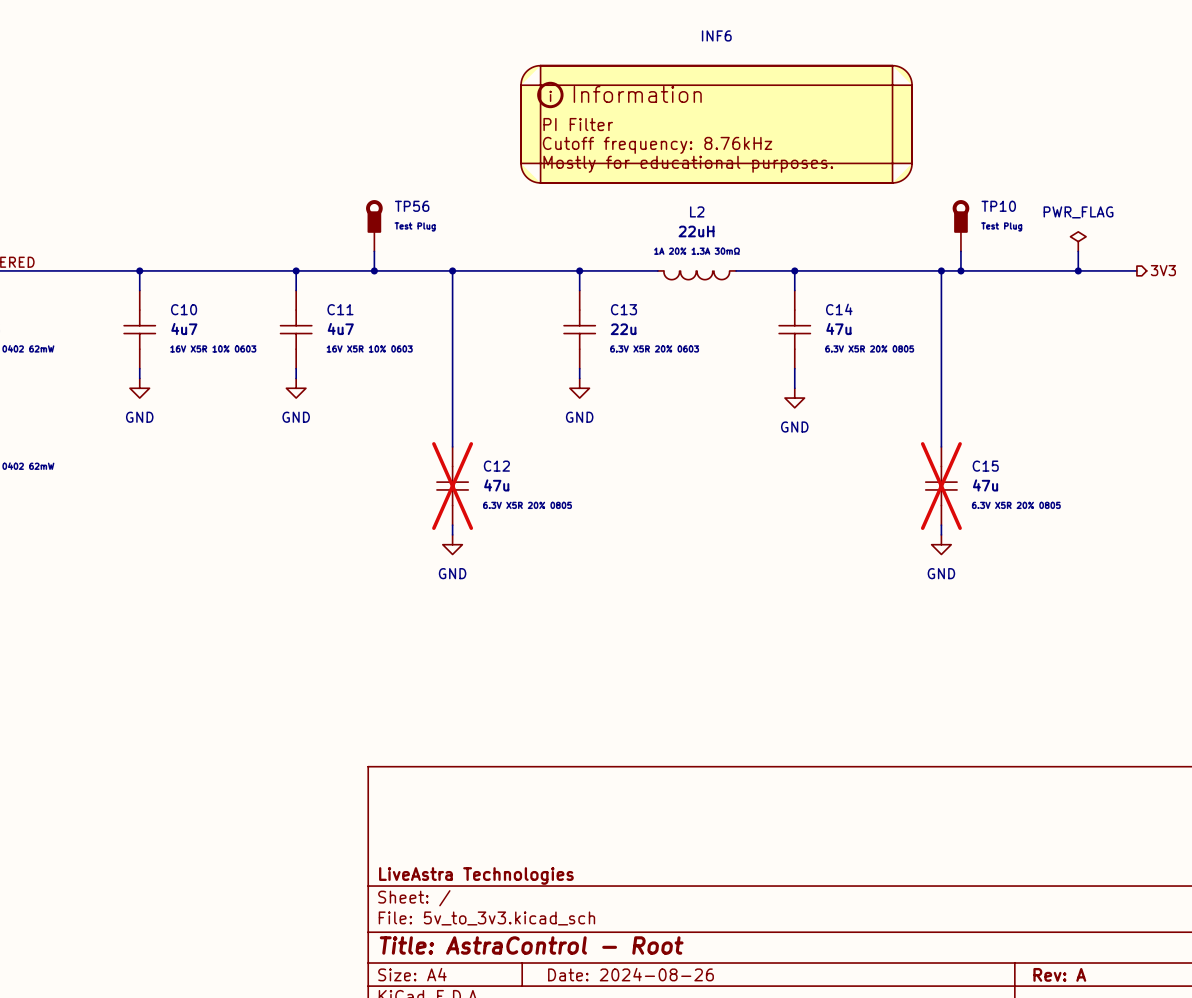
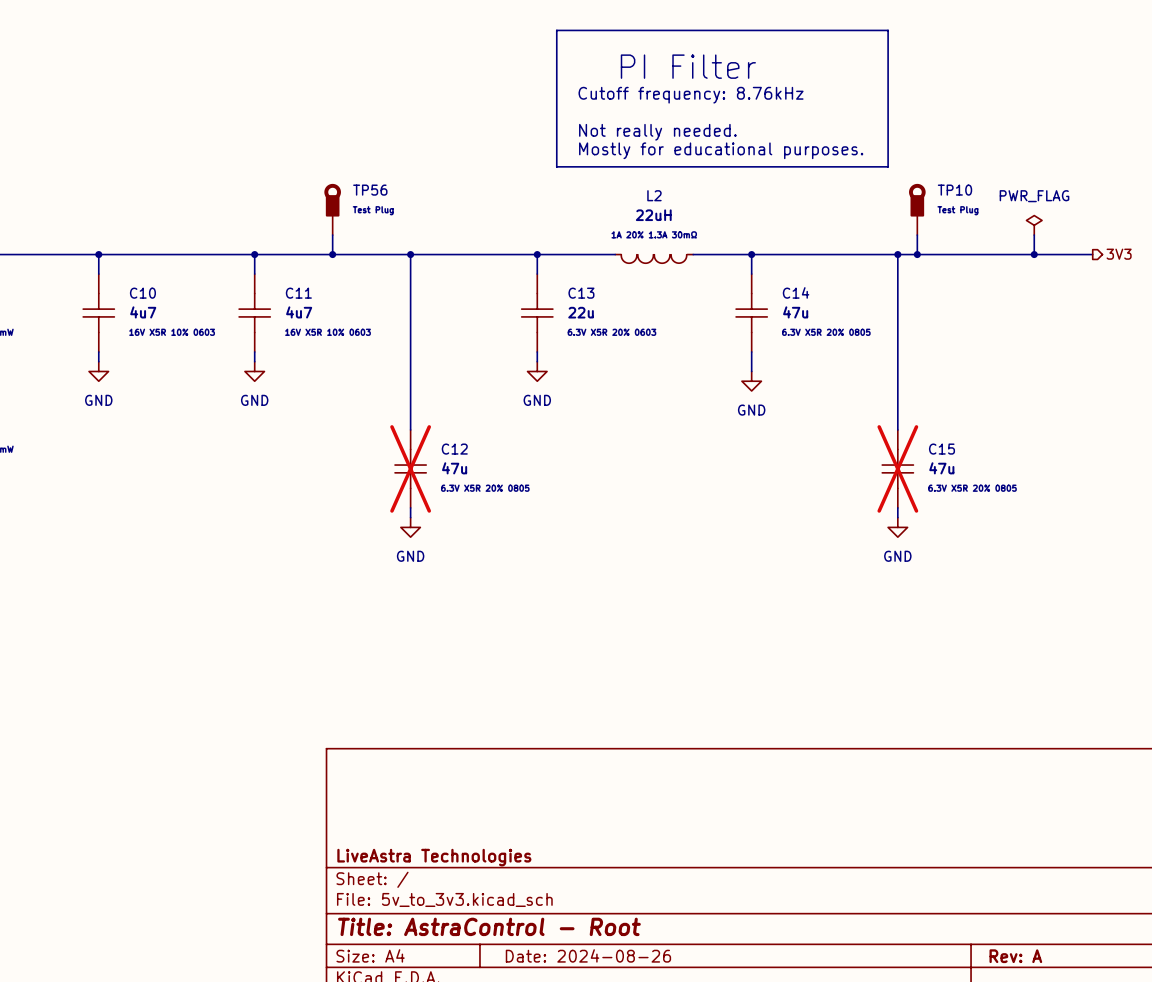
line: none -> (556, 30) (888, 30) (888, 166) (556, 166) (556, 30)
text: none -> PI Filter (688, 66)
text: none -> Cutoff frequency: 8.76kHz (691, 95)
INF6: (716, 124) -> none
text: none -> Not really needed. (657, 132)
text: none -> Mostly for educational purposes. (721, 150)

